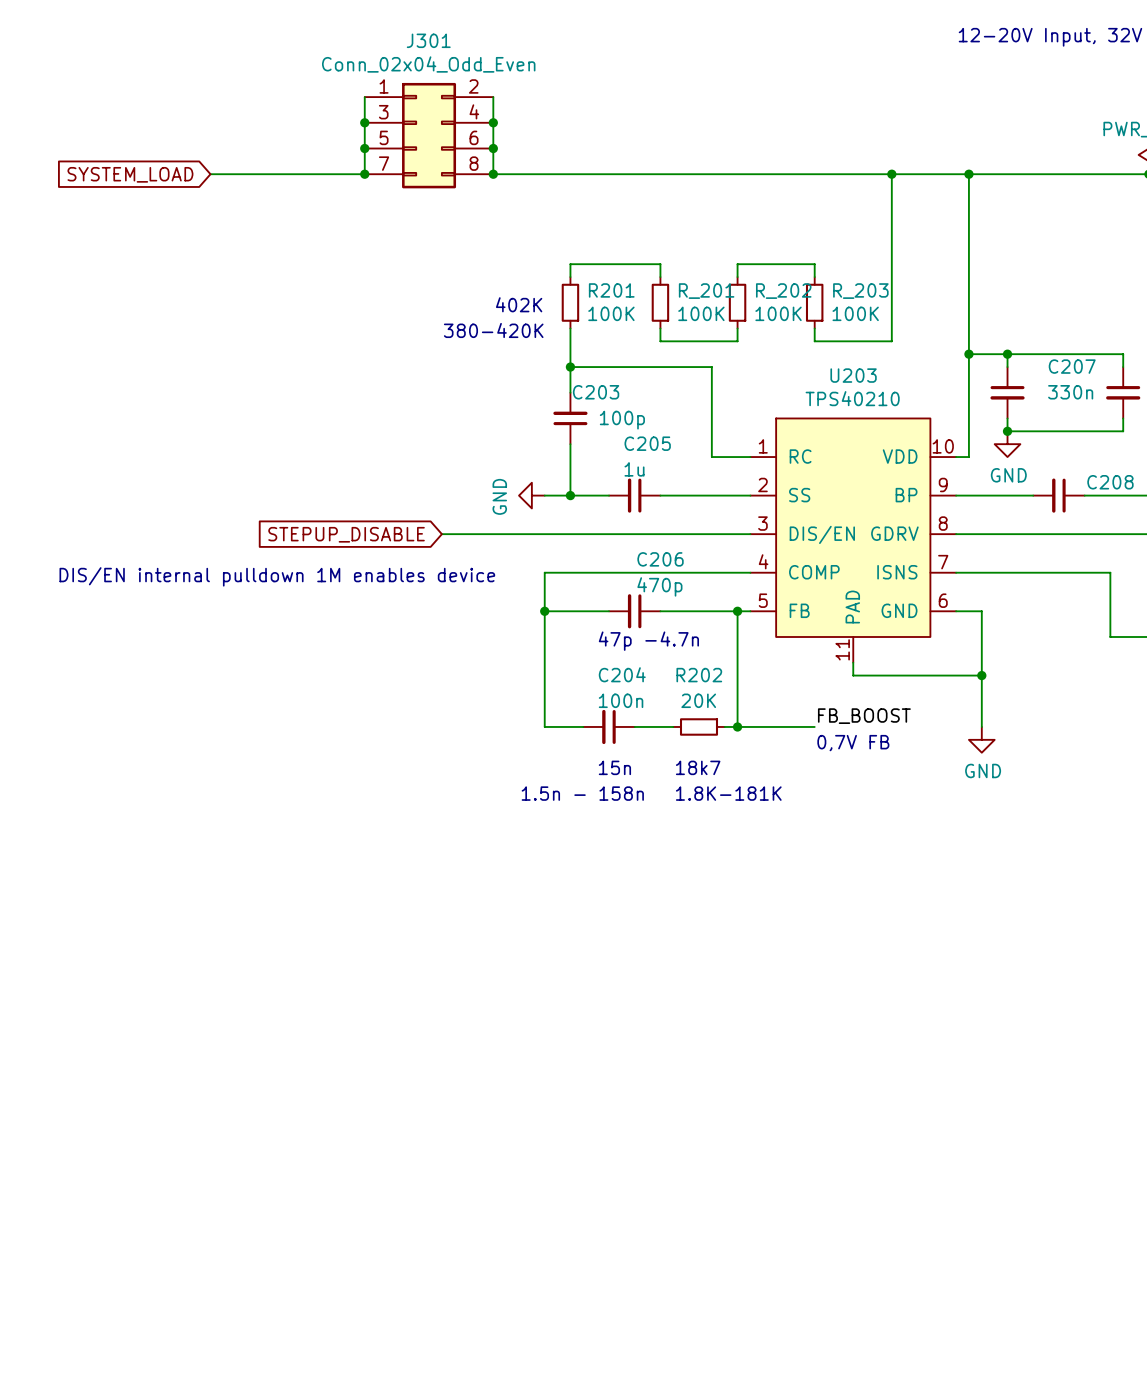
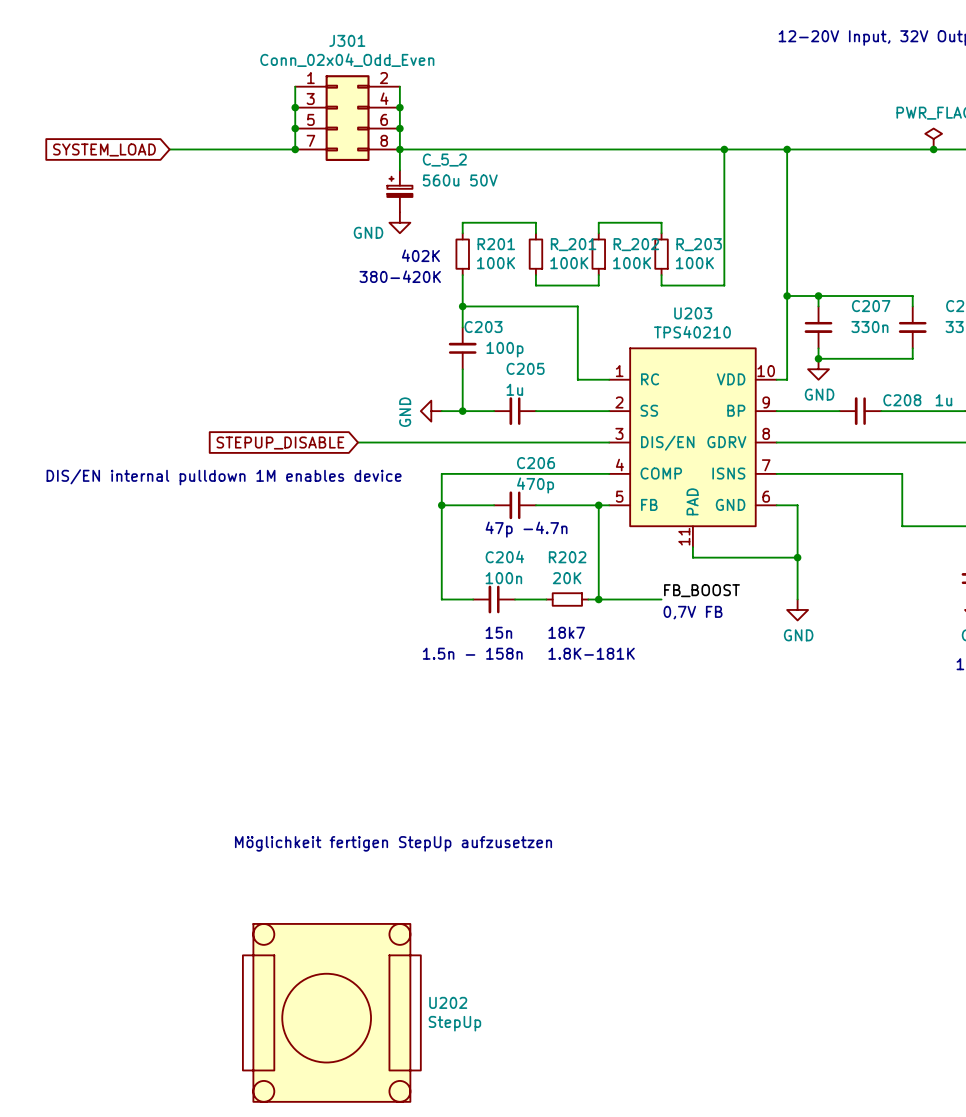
wire: none -> (399, 149) (399, 170)
C_5_2: none -> 560u 50V (399, 191)
power symbol: none -> GND (399, 222)
text: none -> Möglichkeit fertigen StepUp aufzusetzen (393, 843)
U202: none -> StepUp (331, 1012)

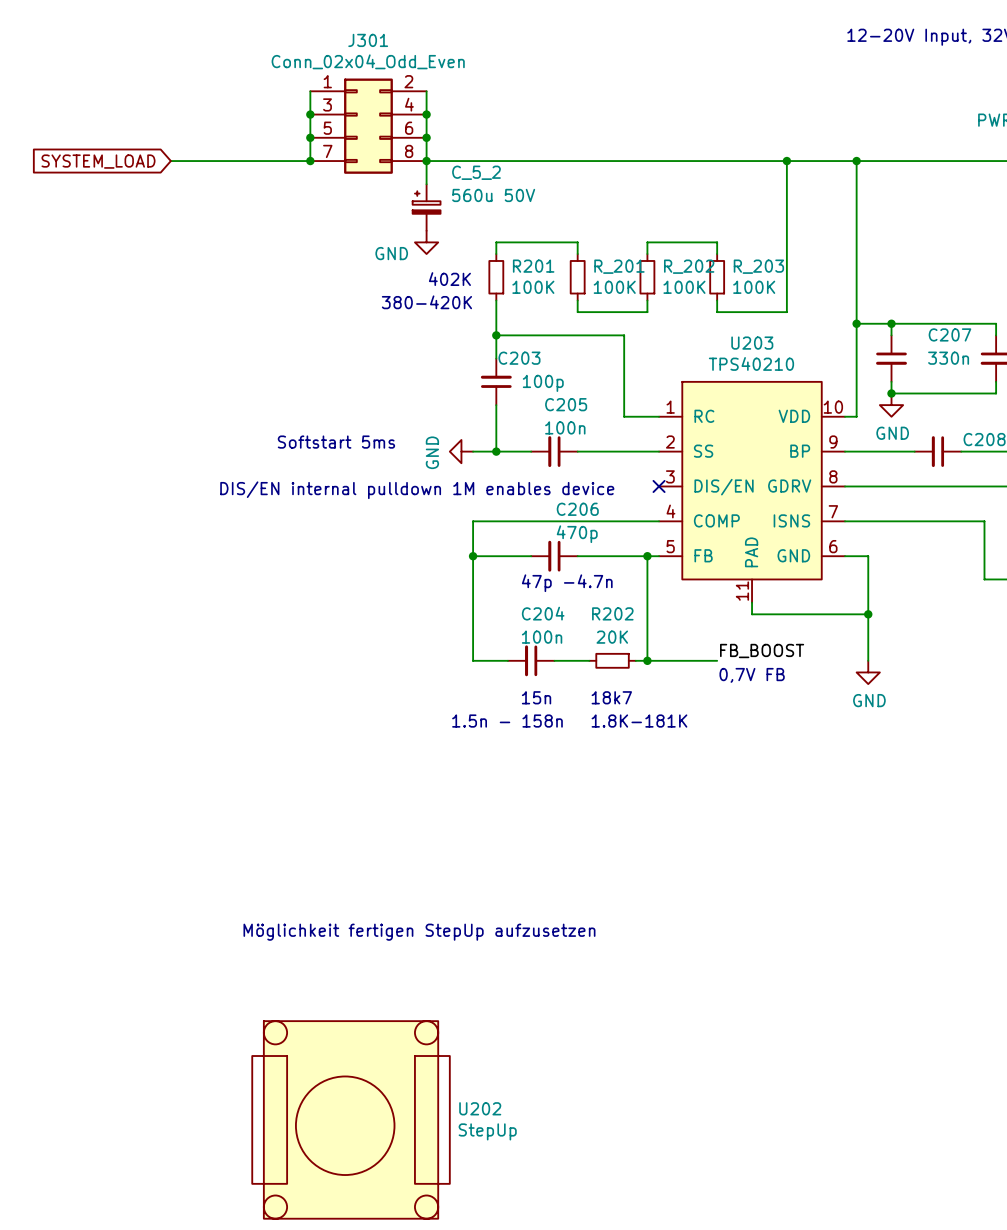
C205 value: 1u (514, 389) -> 100n (565, 427)
text: none -> Softstart 5ms (336, 442)
wire: (358, 442) (609, 442) -> none
no-connect mark: none -> (659, 486)
global label: STEPUP_DISABLE (280, 443) -> none
text position: DIS/EN internal pulldown 1M enables device (224, 477) -> DIS/EN internal pulldown 1M enables device (417, 490)

